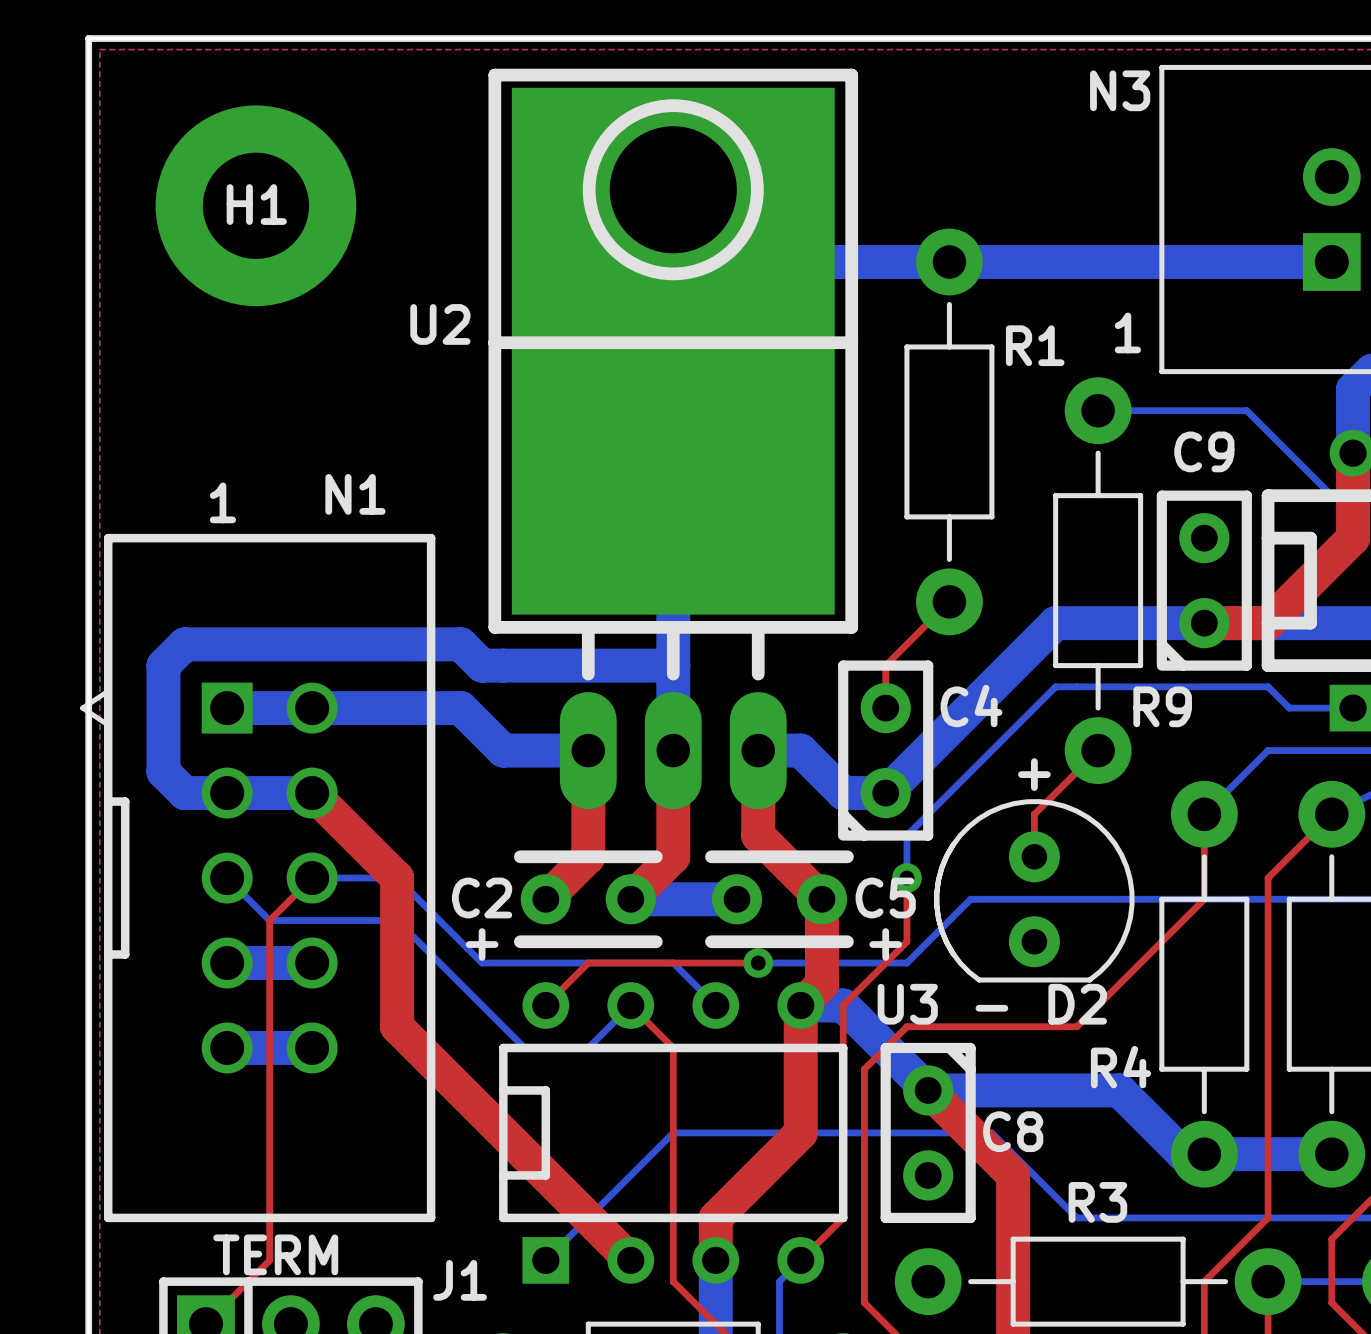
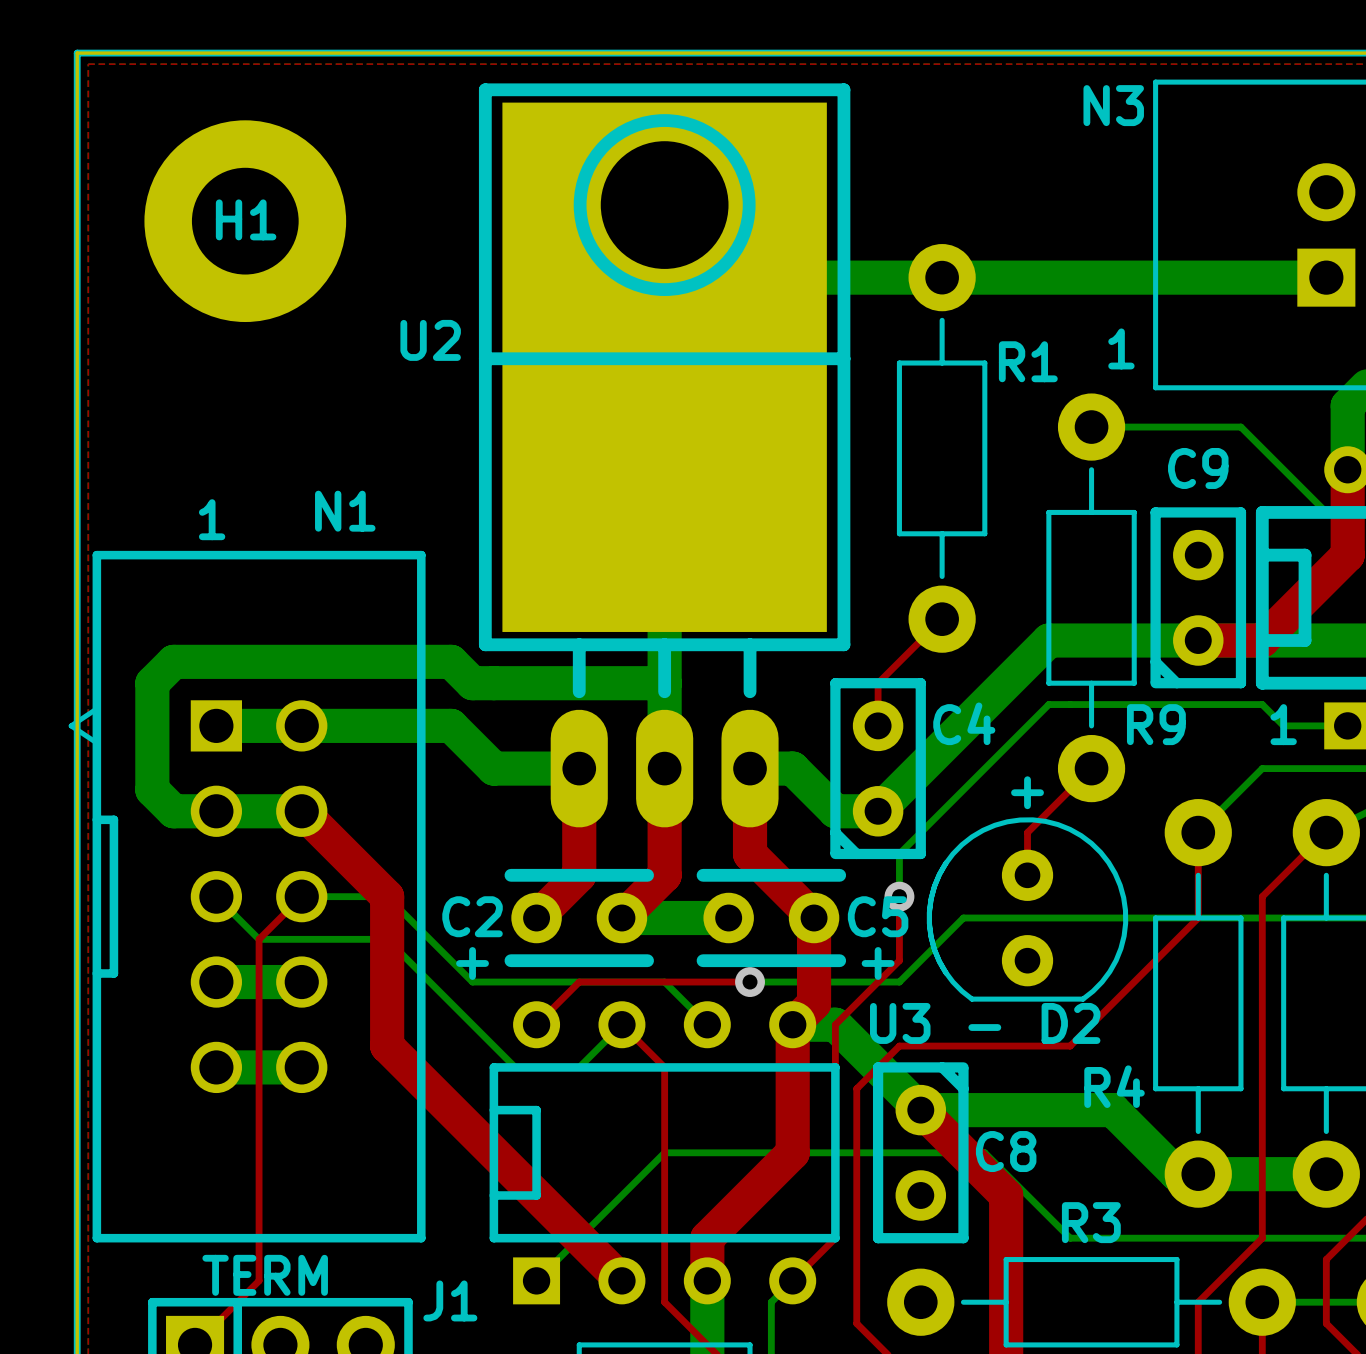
text: none -> 1 (1283, 724)

